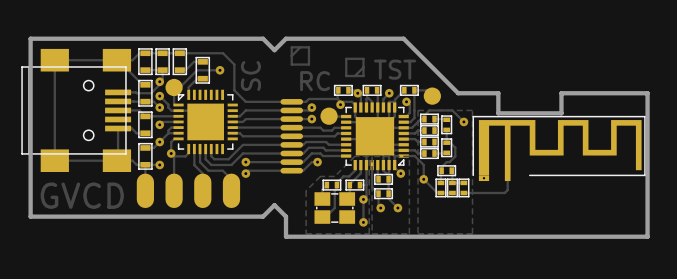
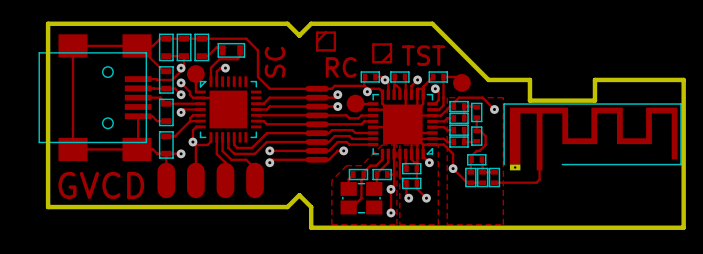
part rotation: 0° (202, 70) -> 90° clockwise (231, 50)
track: (220, 70) (197, 70) (179, 87) (174, 87) -> none
via position: (220, 70) -> (225, 68)
track: (202, 78) (197, 78) (188, 87) -> (240, 50) (240, 56) (237, 59) (219, 59) (210, 67) (210, 73)
track: none -> (225, 68) (220, 68) (216, 71) (216, 81)
via: (159, 142) -> none

